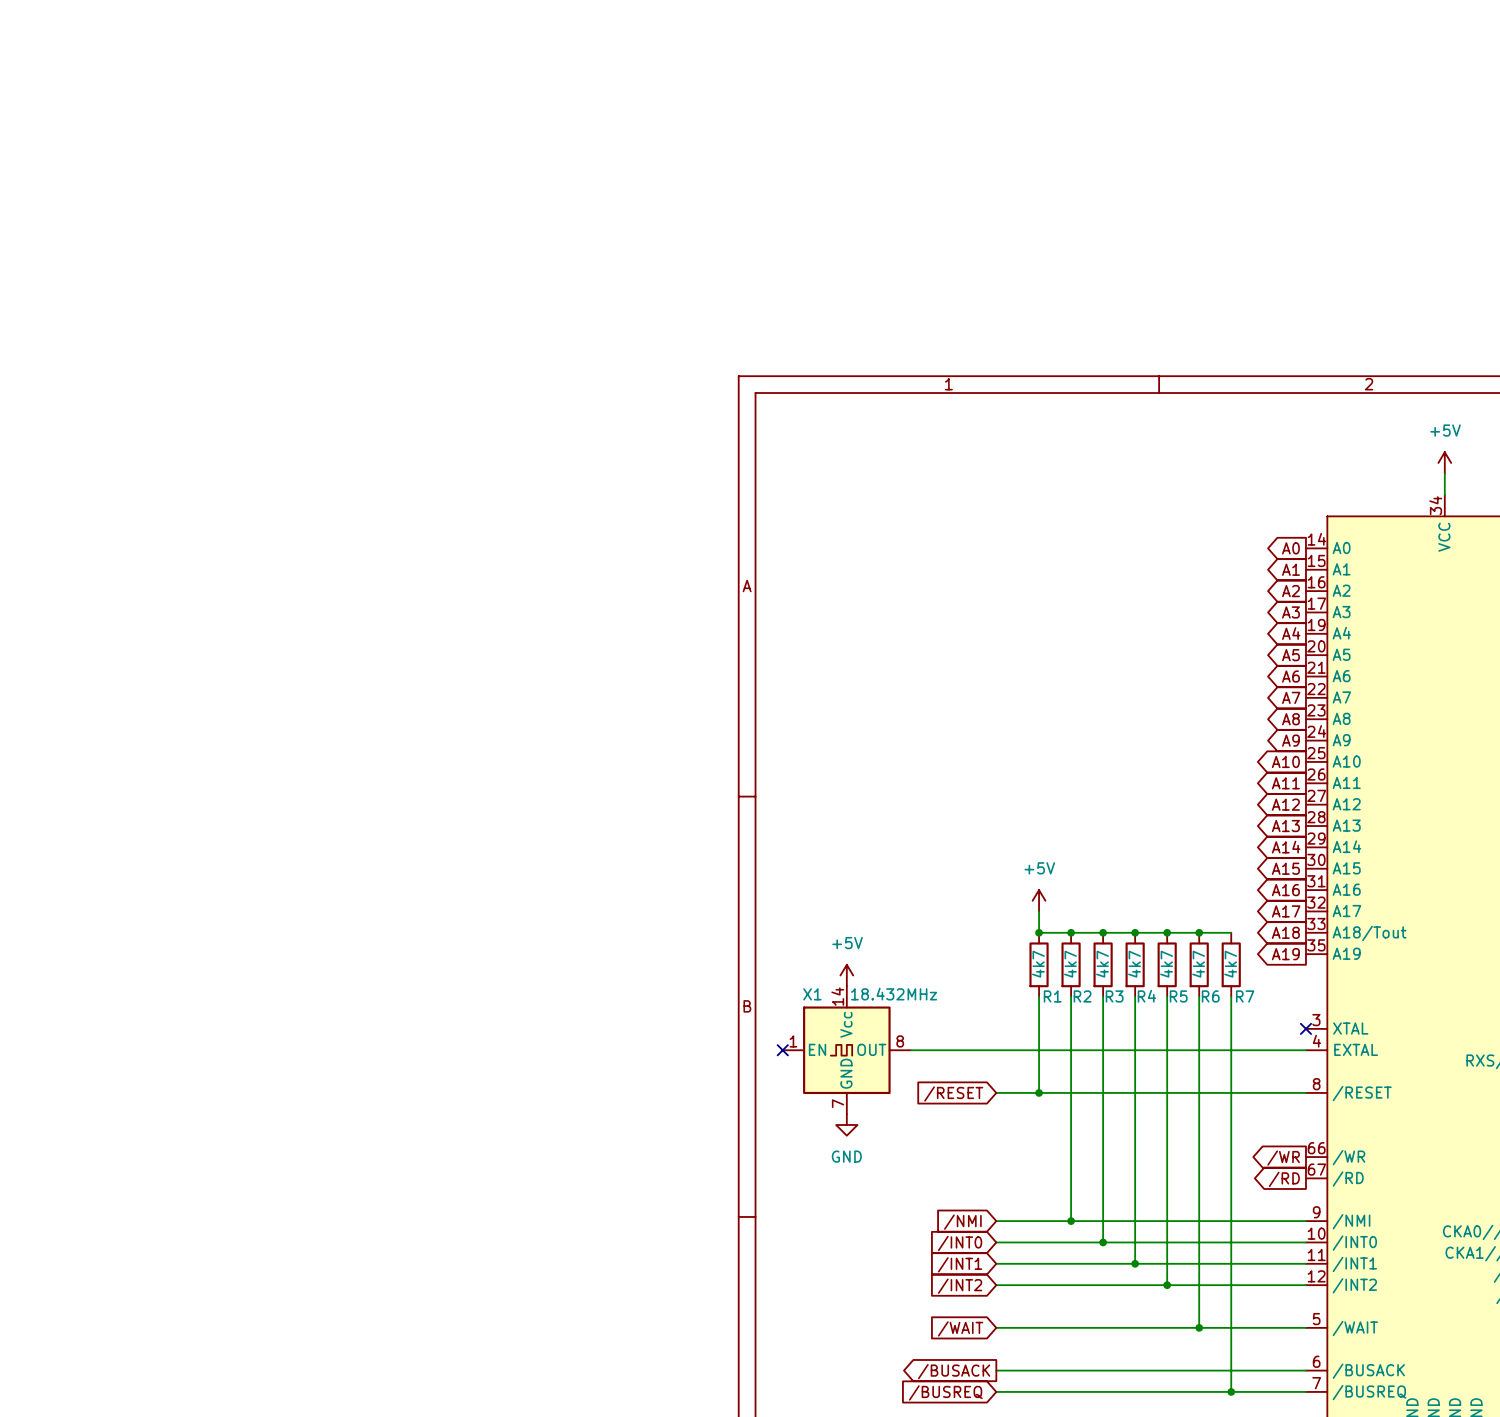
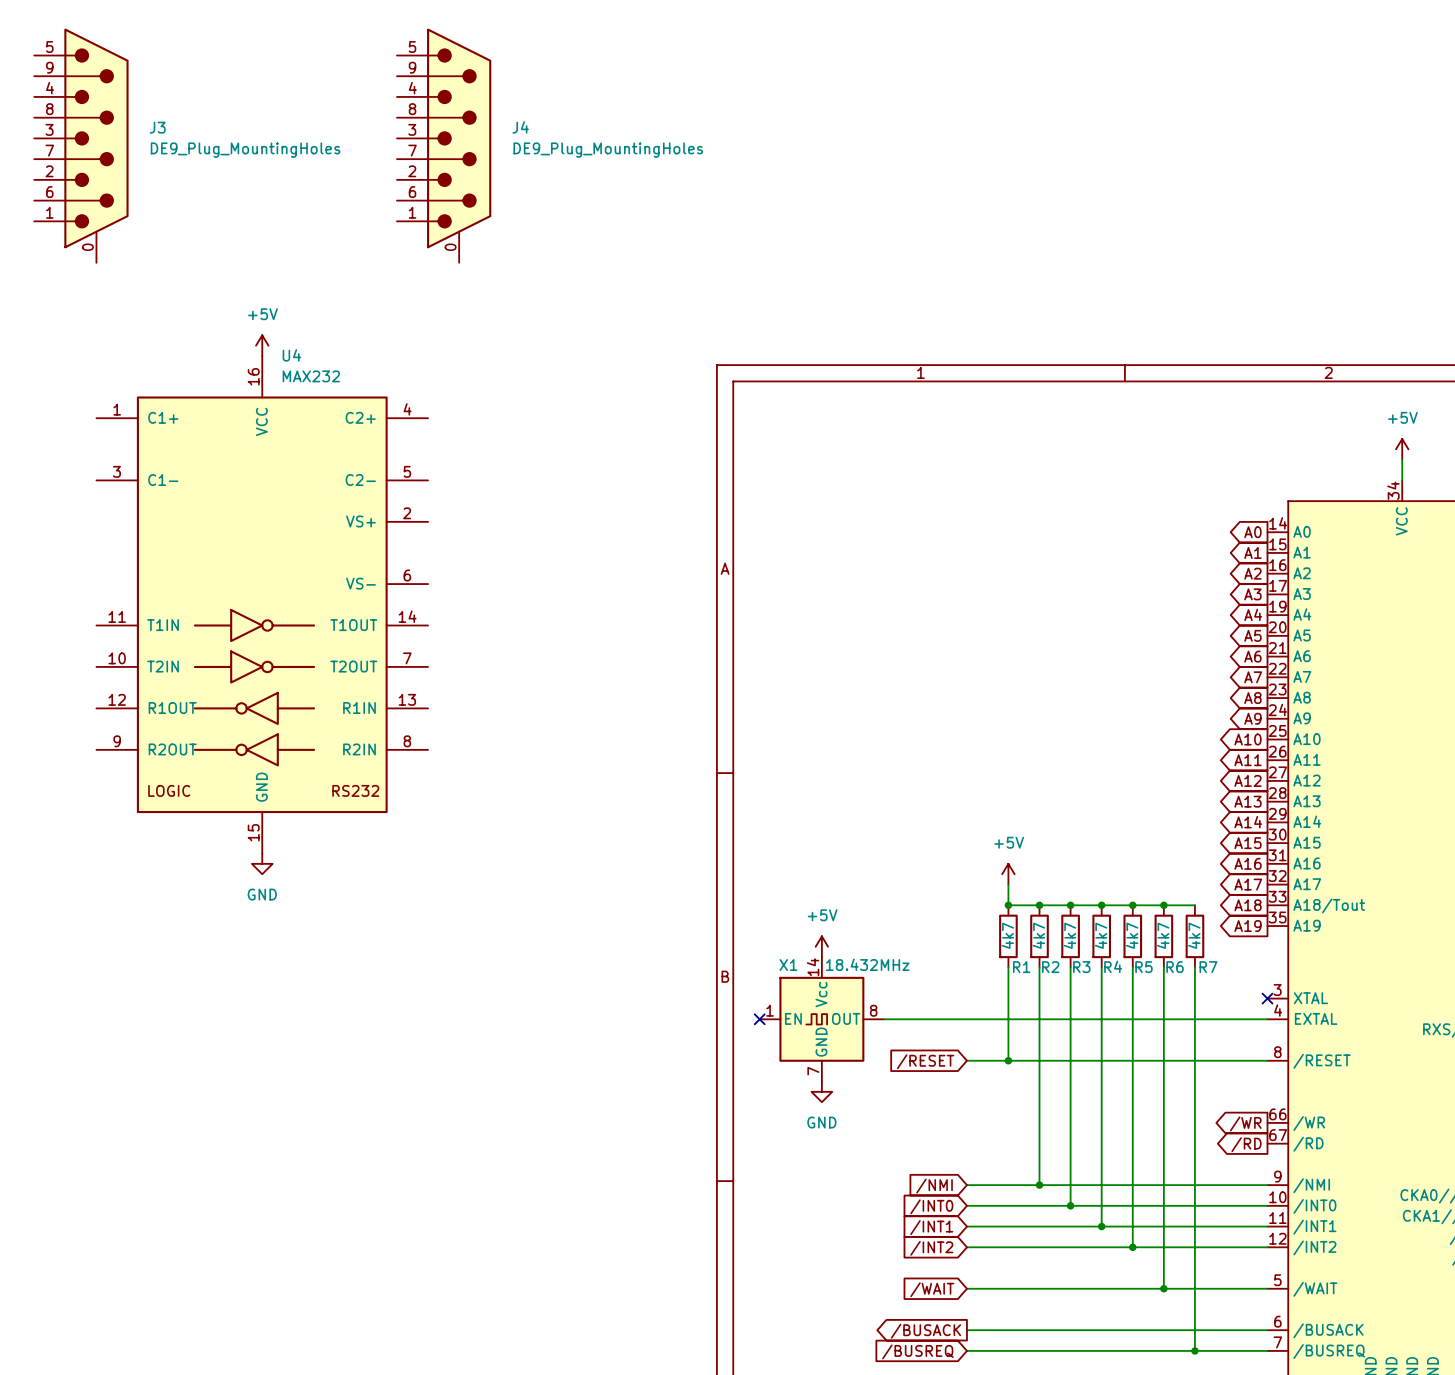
J3: none -> DE9_Plug_MountingHoles (81, 145)
J4: none -> DE9_Plug_MountingHoles (444, 145)
power symbol: none -> +5V (262, 345)
U4: none -> MAX232 (262, 604)
power symbol: none -> GND (262, 863)

